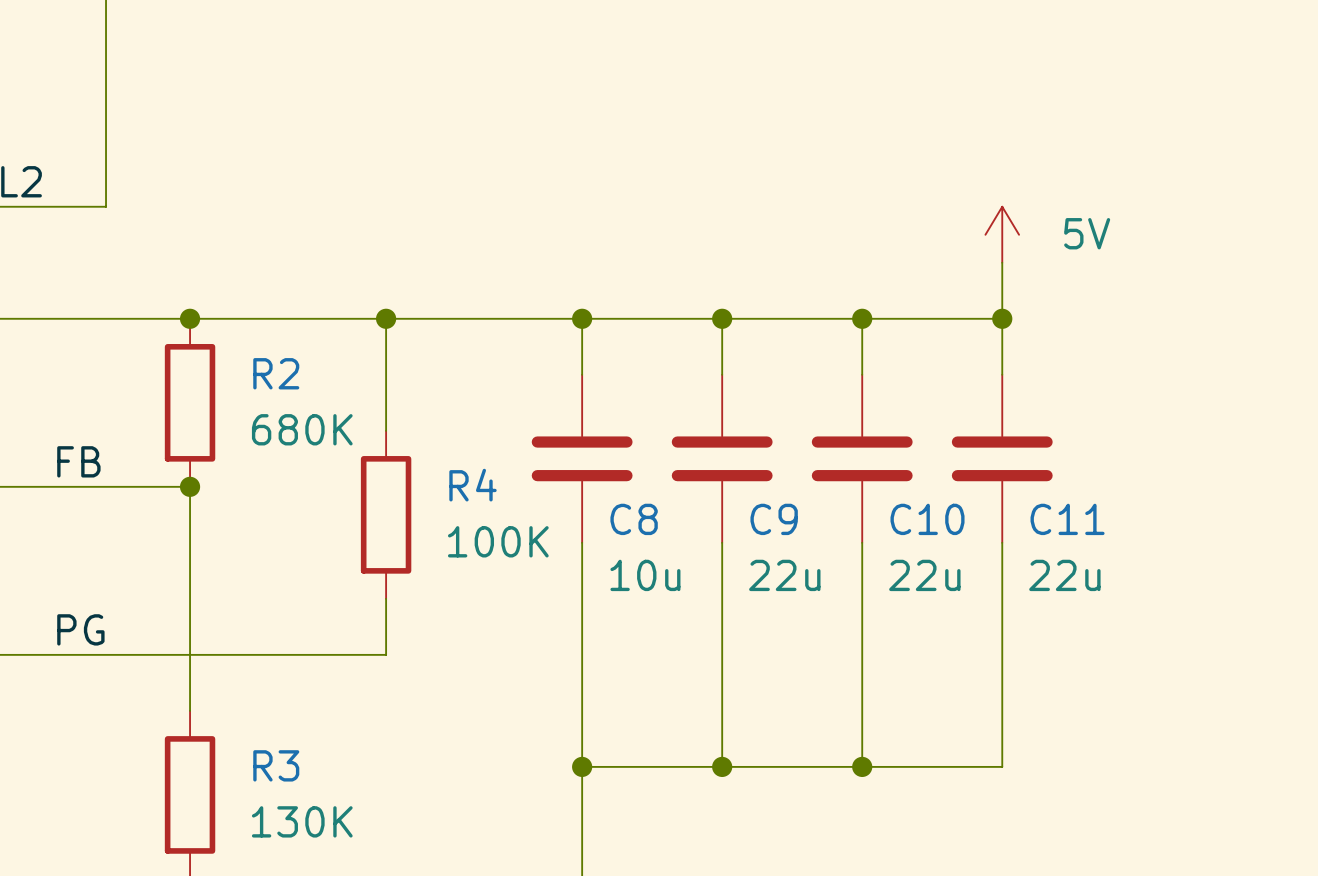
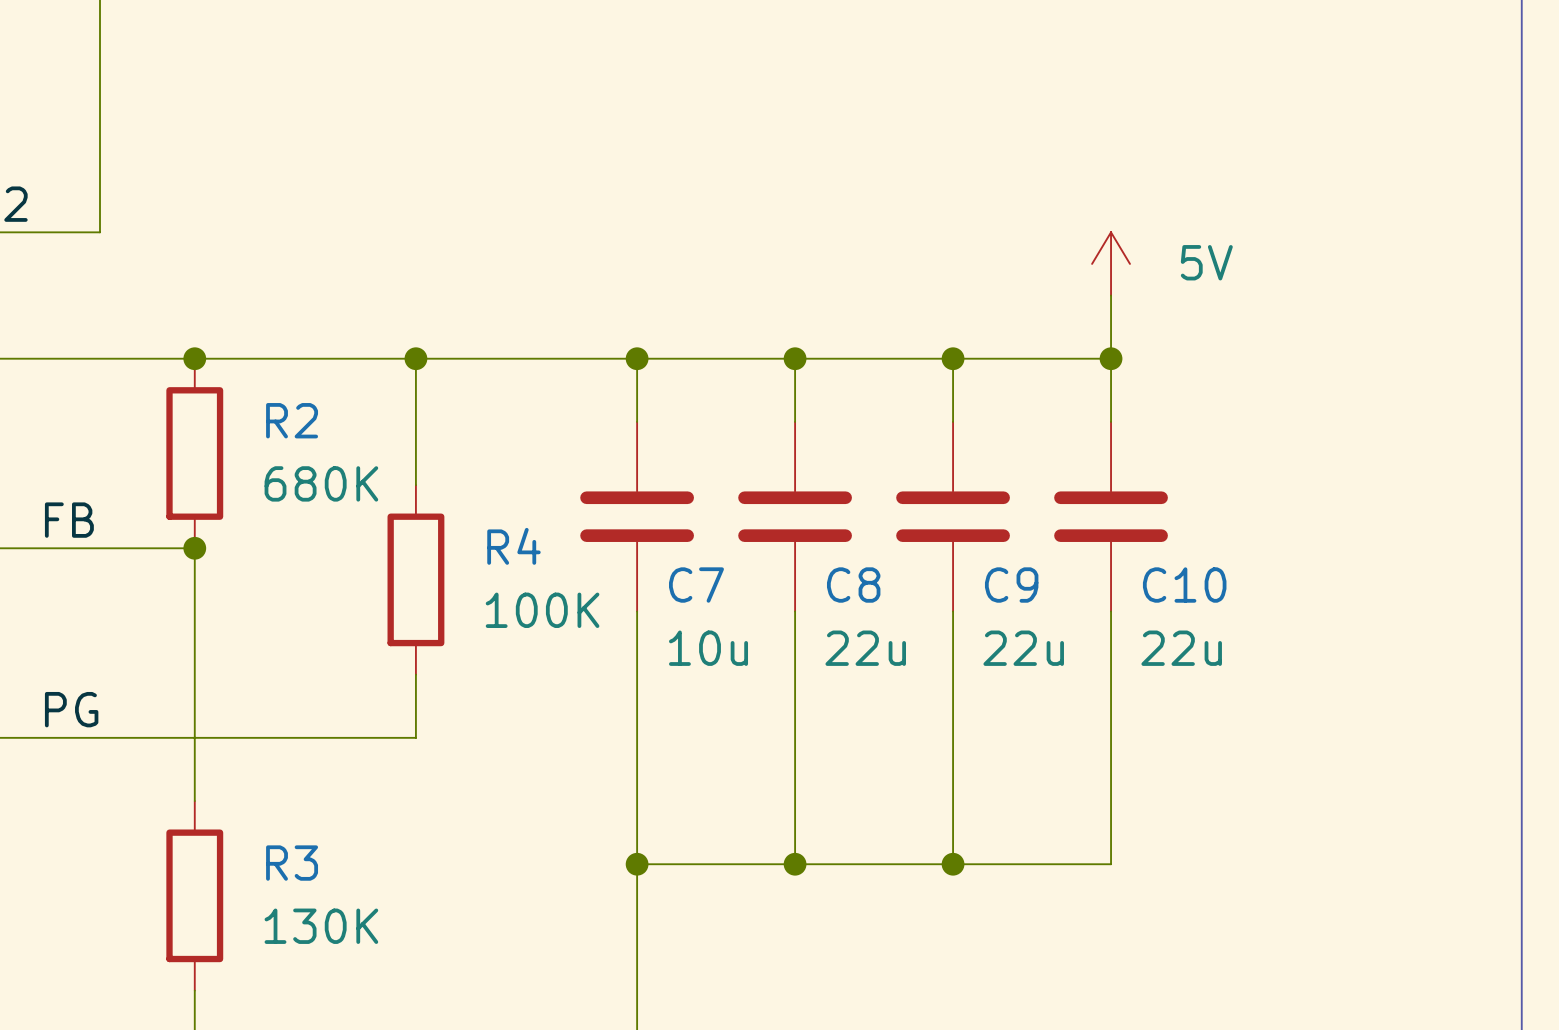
C8 name: C8 (634, 519) -> C7 (696, 585)
C9 name: C9 (774, 519) -> C8 (853, 585)
C10 name: C10 (927, 519) -> C9 (1011, 585)
C11 name: C11 (1067, 519) -> C10 (1184, 585)

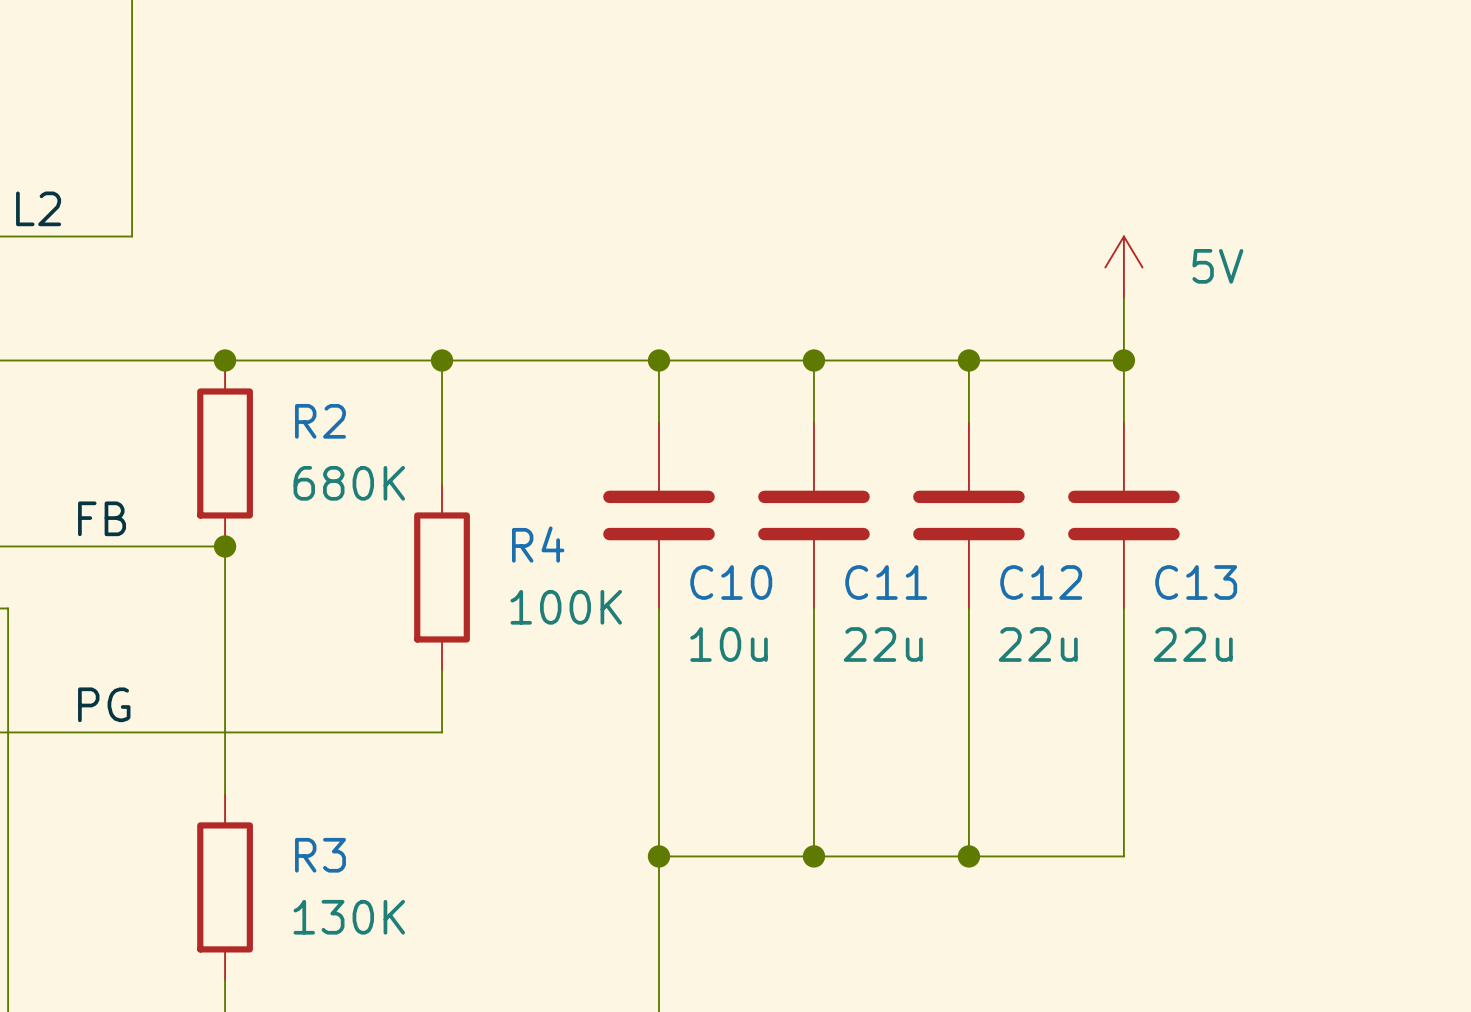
C7 name: C7 (696, 585) -> C10 (731, 582)
C8 name: C8 (853, 585) -> C11 (886, 582)
C9 name: C9 (1011, 585) -> C12 (1041, 582)
C10 name: C10 (1184, 585) -> C13 (1196, 582)

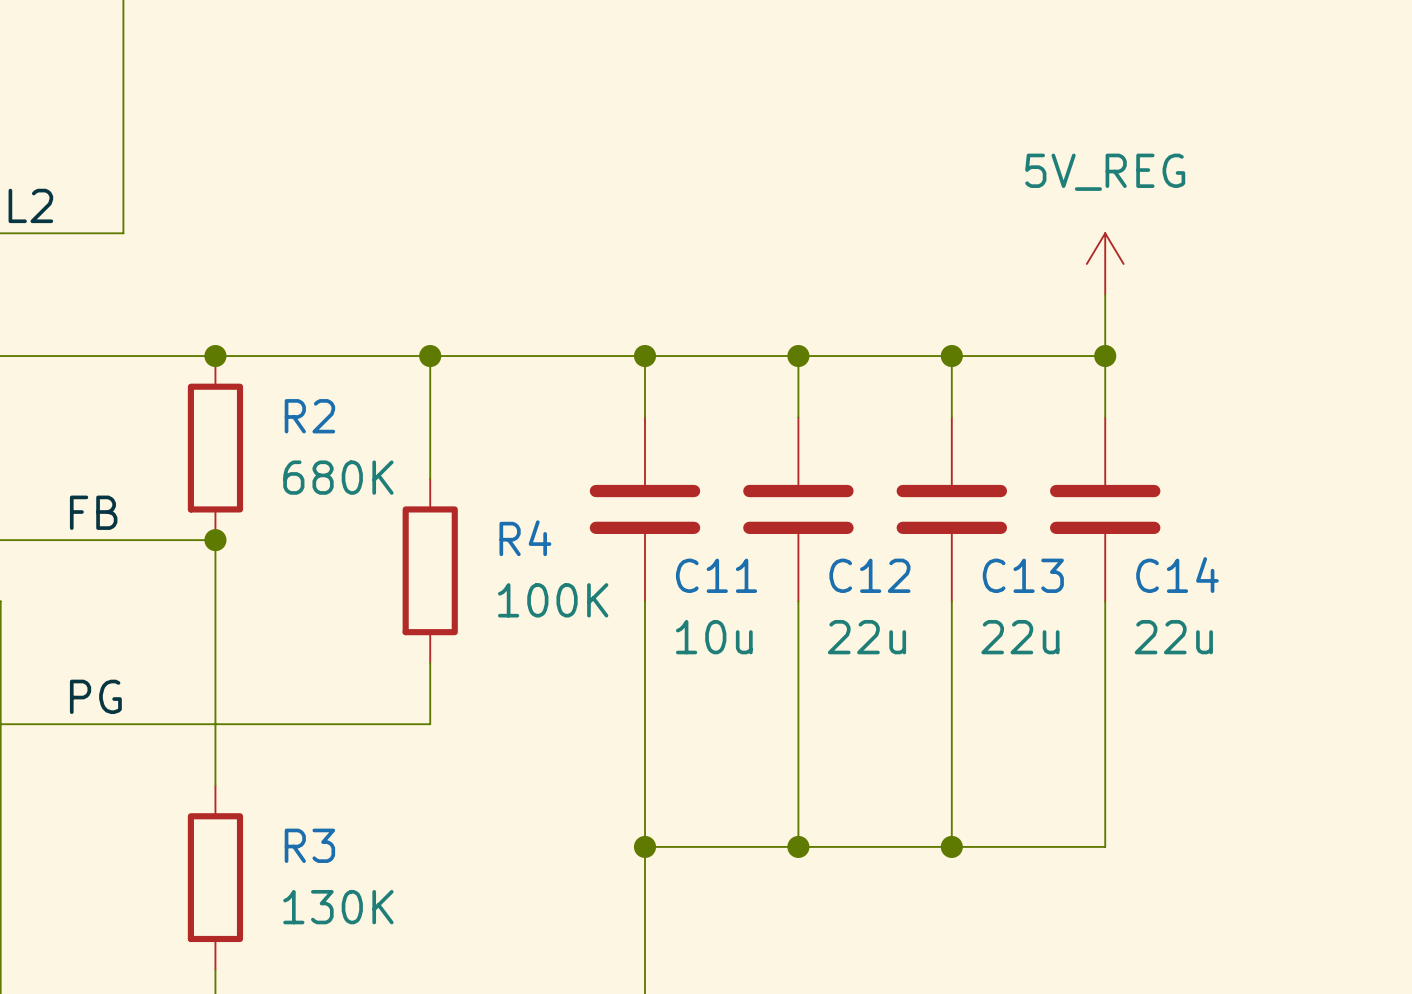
power symbol: 5V (1123, 267) -> 5V_REG (1105, 263)
C10 name: C10 (731, 582) -> C11 (716, 575)
C11 name: C11 (886, 582) -> C12 (869, 575)
C12 name: C12 (1041, 582) -> C13 (1023, 575)
C13 name: C13 (1196, 582) -> C14 (1177, 575)

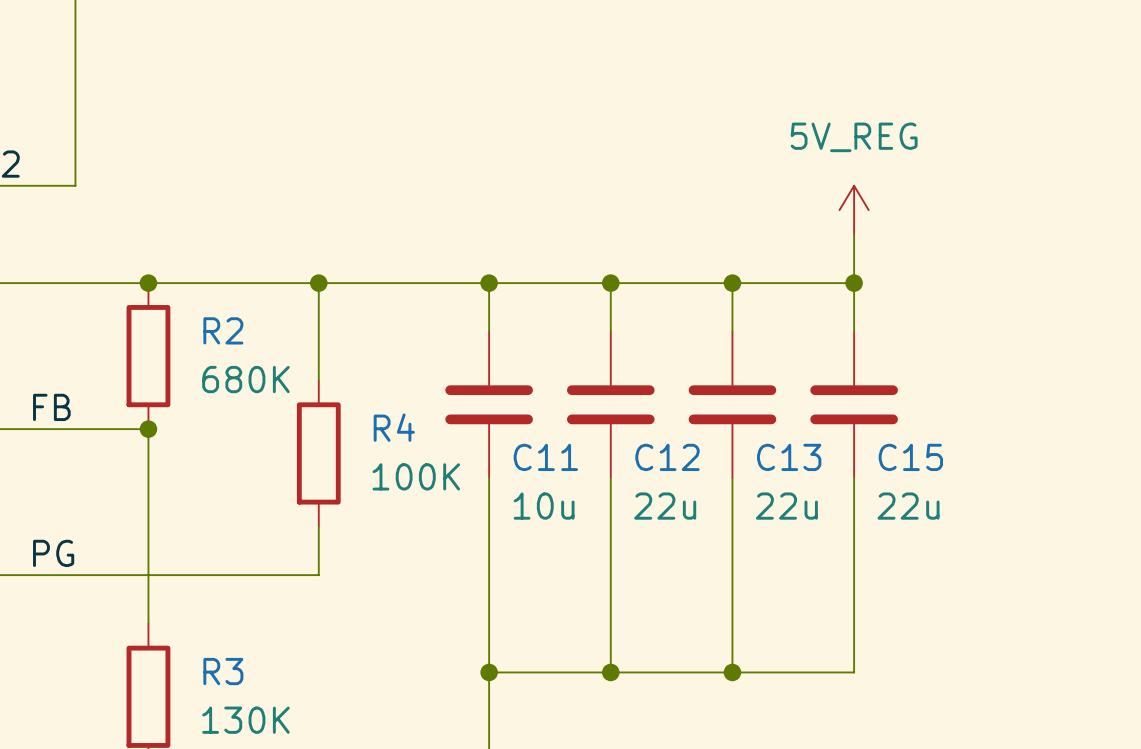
C14 name: C14 (1177, 575) -> C15 (910, 457)

